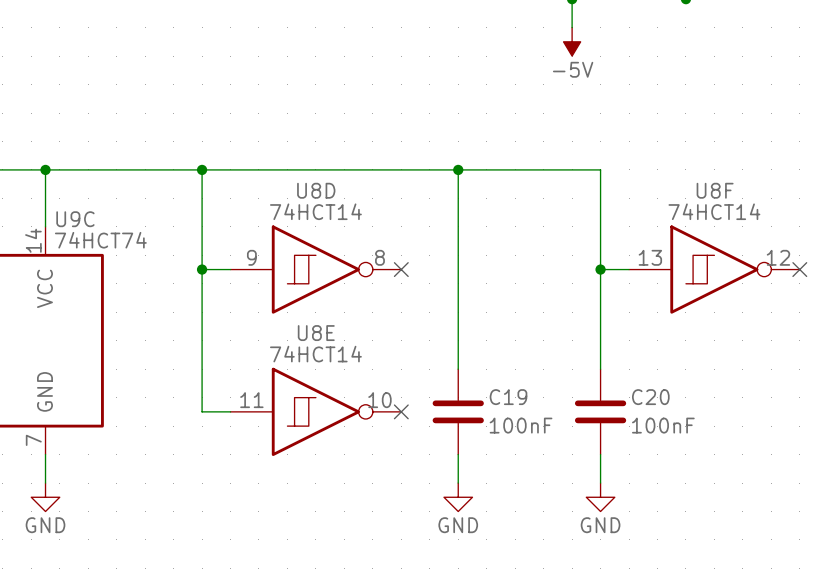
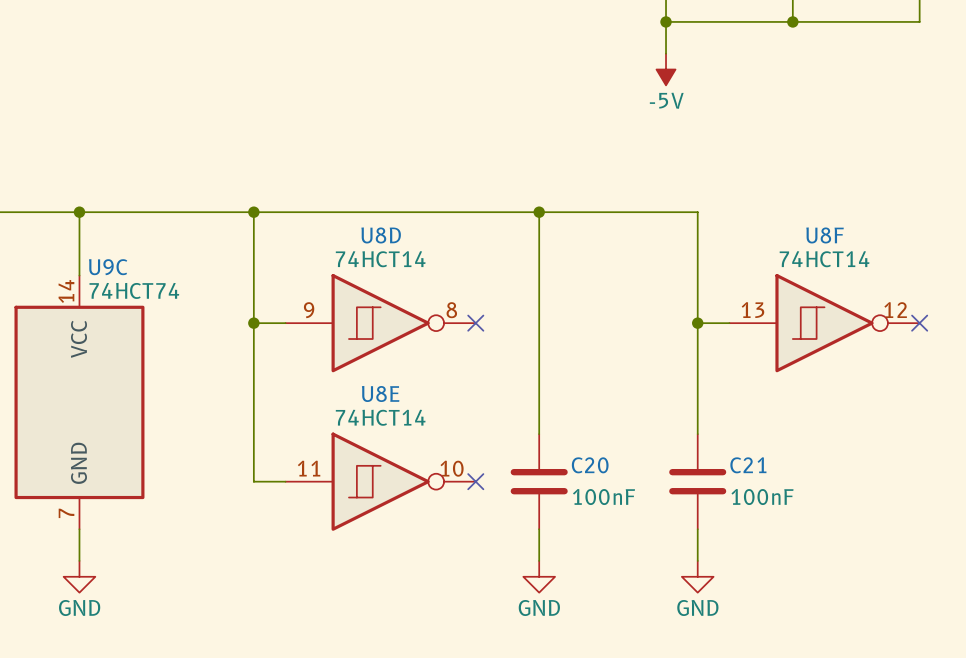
C19 name: C19 (508, 397) -> C20 (590, 465)
C20 name: C20 (650, 397) -> C21 (748, 465)

